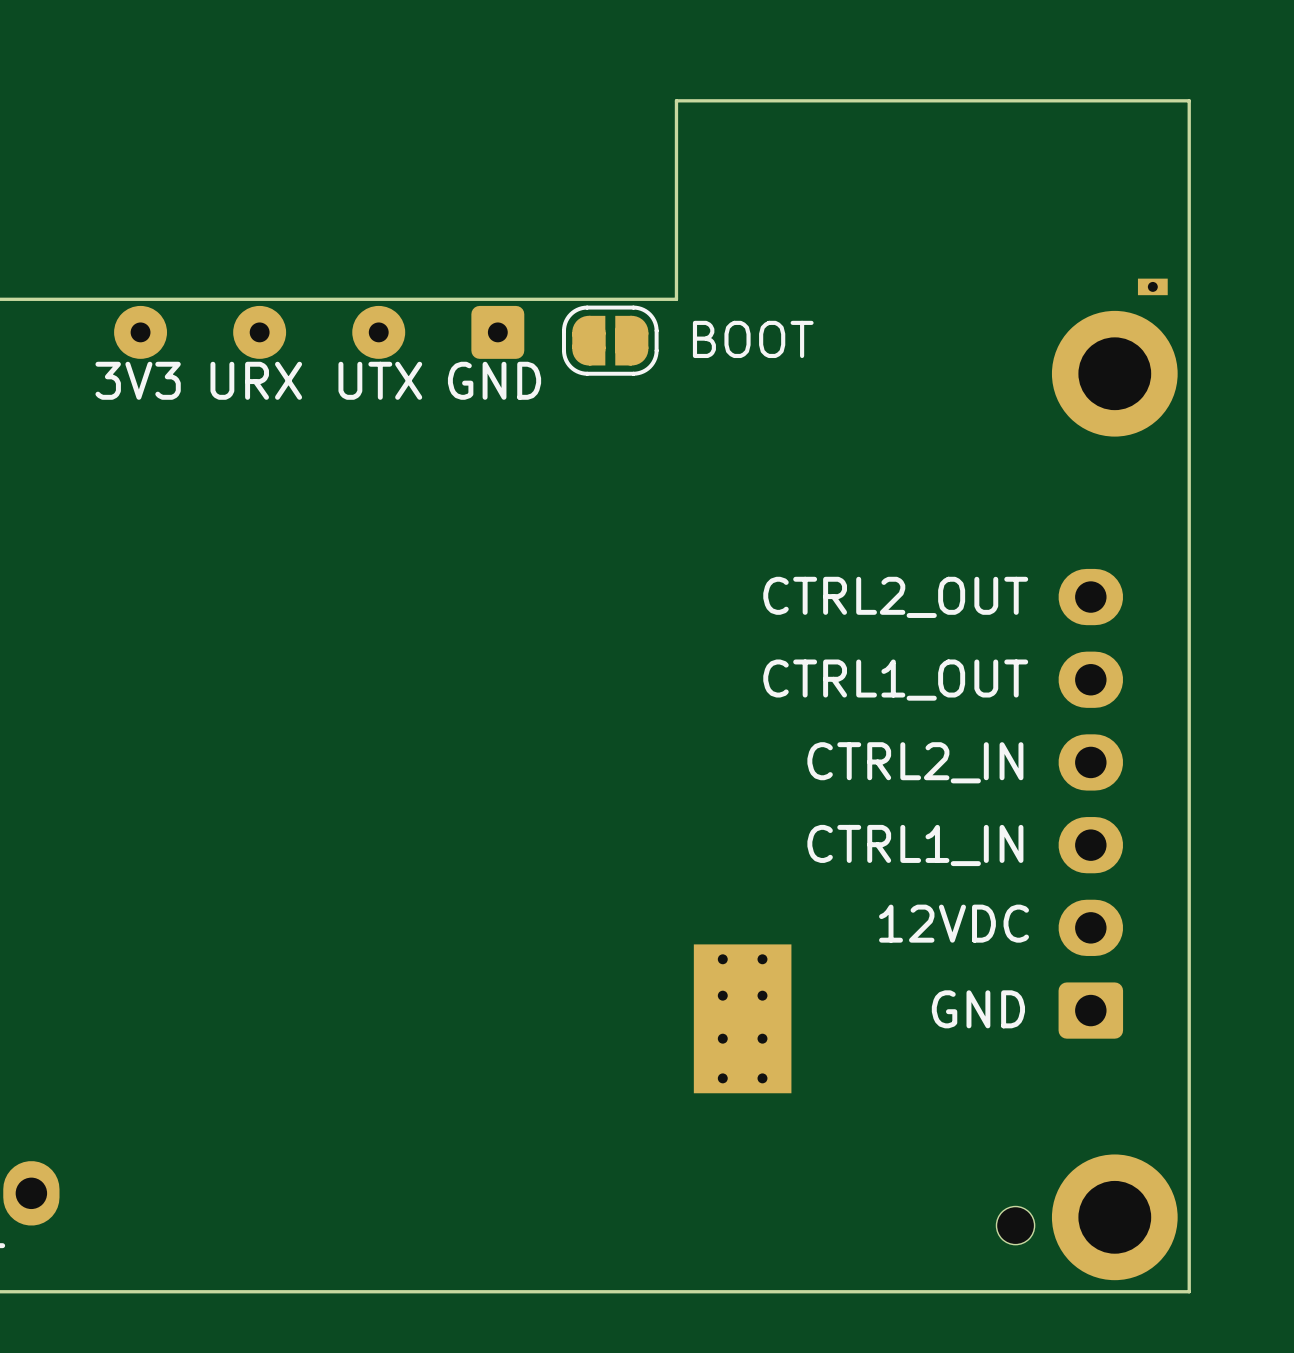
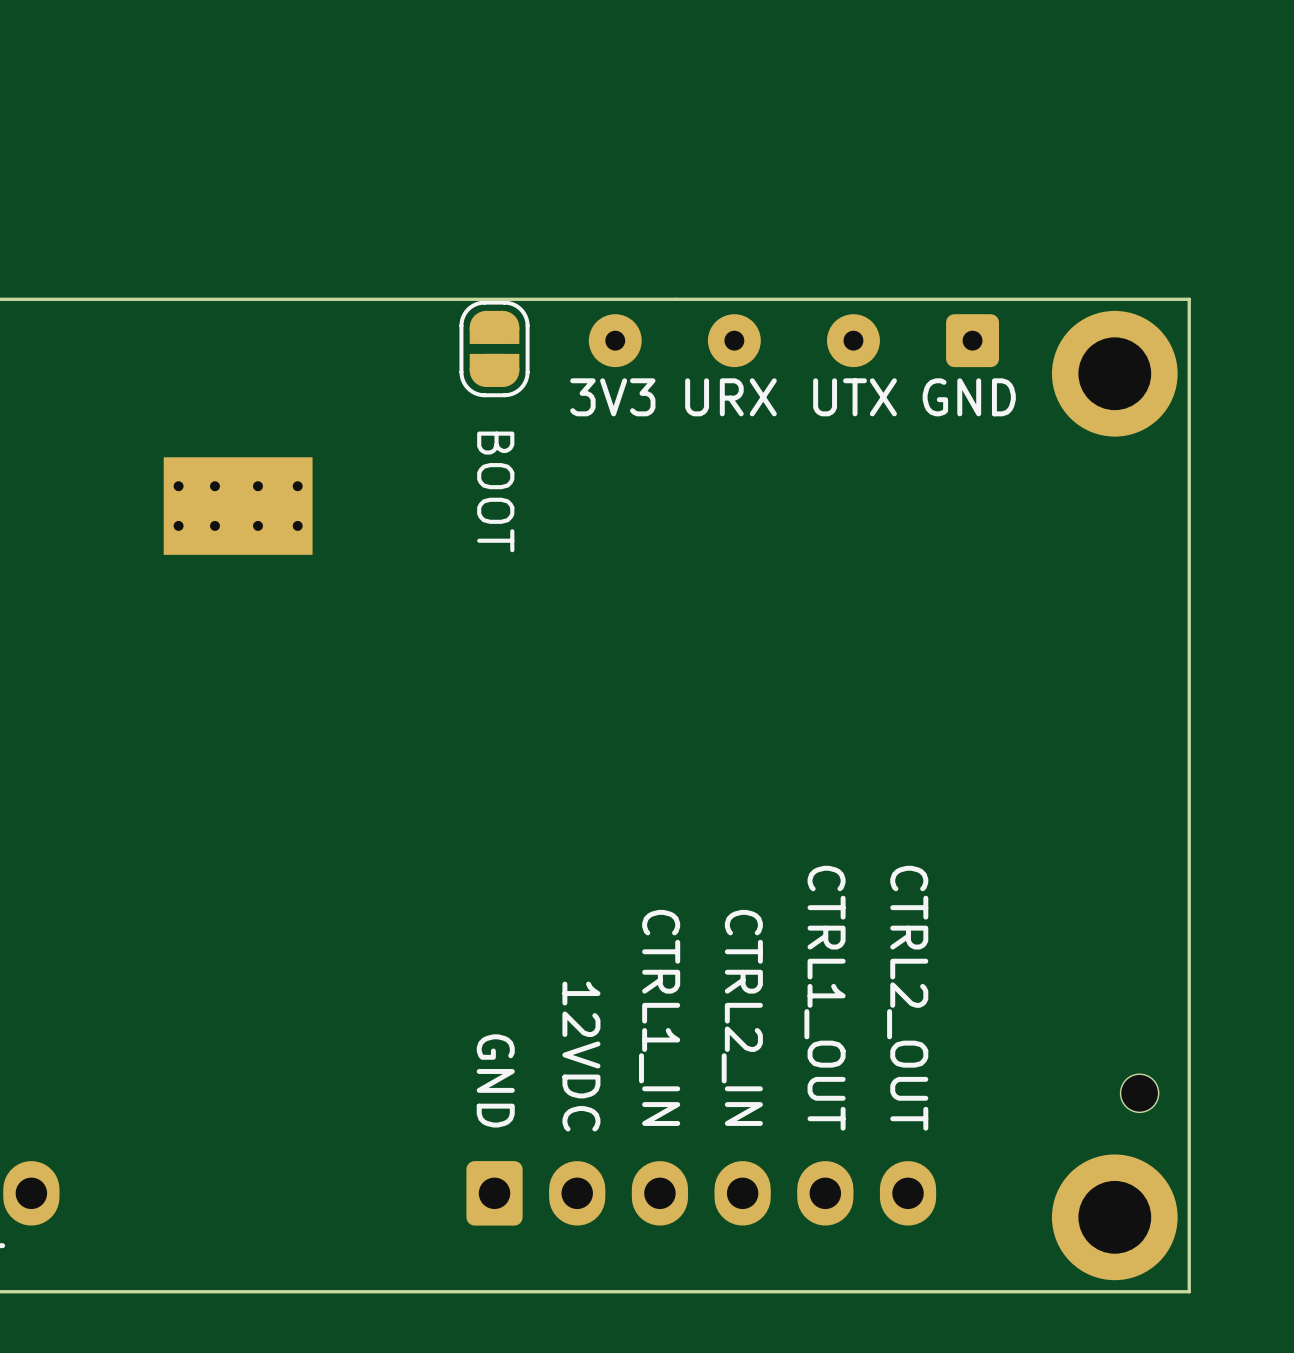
part: (1152, 286) -> none
board edge: (1189, 299) (1189, 100) (676, 100) (676, 299) -> (1189, 299) (676, 299)
part position: (319, 332) -> (793, 340)
part rotation: 0° (610, 340) -> 90° clockwise (494, 348)
part position: (610, 340) -> (494, 348)
text position: 3V3 (138, 380) -> 3V3 (612, 397)
text position: URX (256, 380) -> URX (730, 397)
text position: UTX (380, 380) -> UTX (855, 397)
text: GND (494, 380) -> none
text: none -> GND (969, 397)
text rotation: 0° (895, 597) -> 90° clockwise (907, 998)
text position: CTRL2_OUT (895, 597) -> CTRL2_OUT (907, 998)
text rotation: 0° (895, 680) -> 90° clockwise (824, 998)
text rotation: 0° (915, 762) -> 90° clockwise (742, 1017)
text position: CTRL2_IN (915, 762) -> CTRL2_IN (742, 1017)
part rotation: 0° (1090, 803) -> 90° clockwise (701, 1193)
part position: (1090, 803) -> (701, 1193)
text rotation: 0° (915, 845) -> 90° clockwise (659, 1017)
text position: CTRL1_IN (915, 845) -> CTRL1_IN (659, 1017)
text rotation: 0° (954, 923) -> 90° clockwise (581, 1056)
text position: 12VDC (954, 923) -> 12VDC (581, 1056)
text: GND (978, 1009) -> none
part rotation: 0° (742, 1018) -> 90° counterclockwise (238, 506)
part position: (742, 1018) -> (238, 506)
text: none -> GND (495, 1080)
part position: (1015, 1225) -> (1139, 1093)

